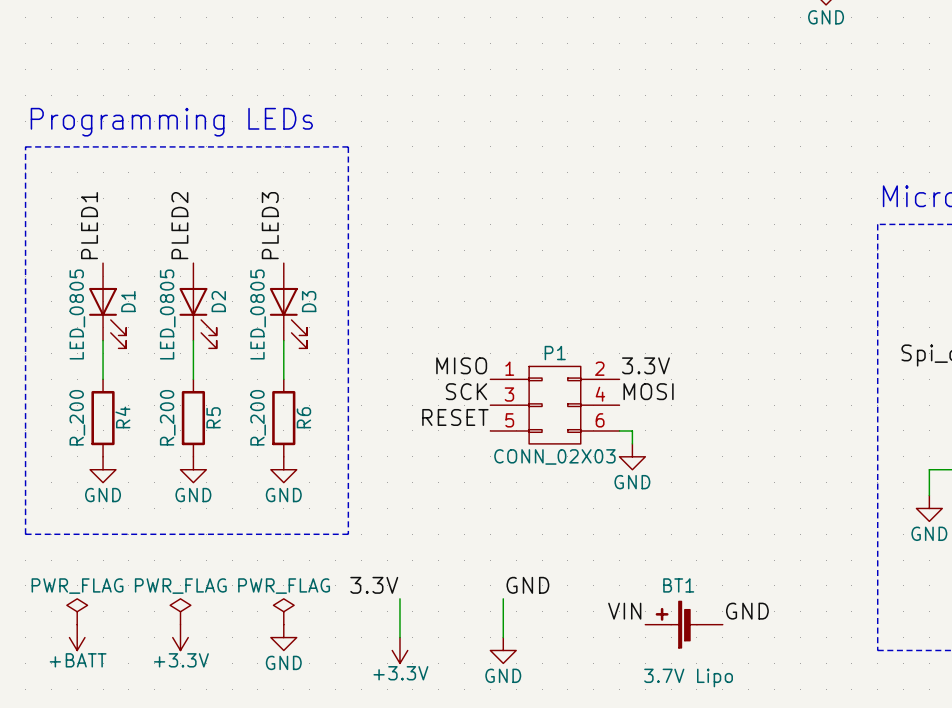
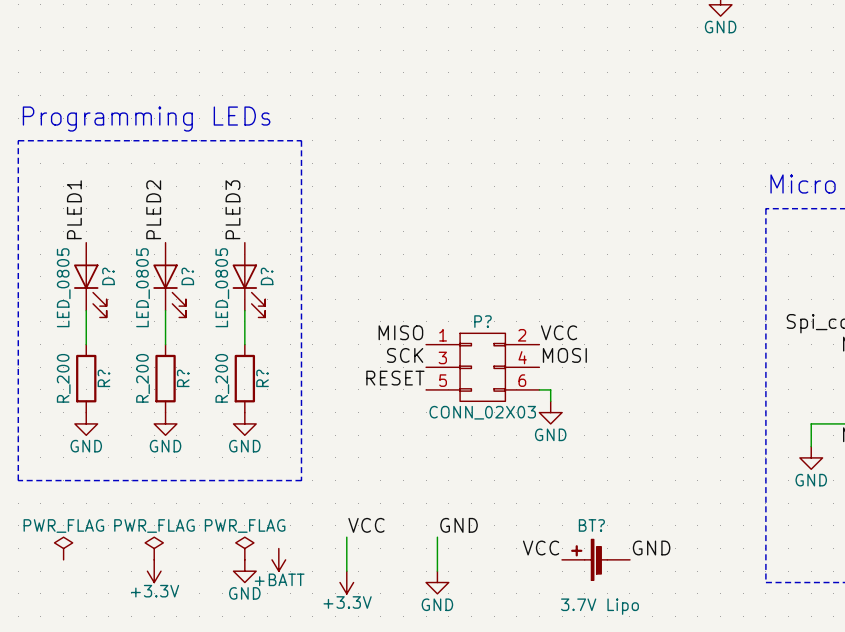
D1 name: D1 (128, 301) -> D? (108, 276)
D2 name: D2 (218, 301) -> D? (187, 276)
D3 name: D3 (309, 301) -> D? (267, 276)
P1 name: P1 (555, 353) -> P? (482, 321)
label: 3.3V (645, 365) -> VCC (559, 332)
R4 name: R4 (122, 417) -> R? (103, 378)
R5 name: R5 (213, 417) -> R? (183, 378)
R6 name: R6 (303, 417) -> R? (262, 378)
label: 3.3V (374, 585) -> VCC (366, 525)
BT1 name: BT1 (678, 585) -> BT? (591, 525)
label: VIN (624, 611) -> VCC (541, 548)
power symbol position: +BATT (77, 637) -> +BATT (278, 559)

